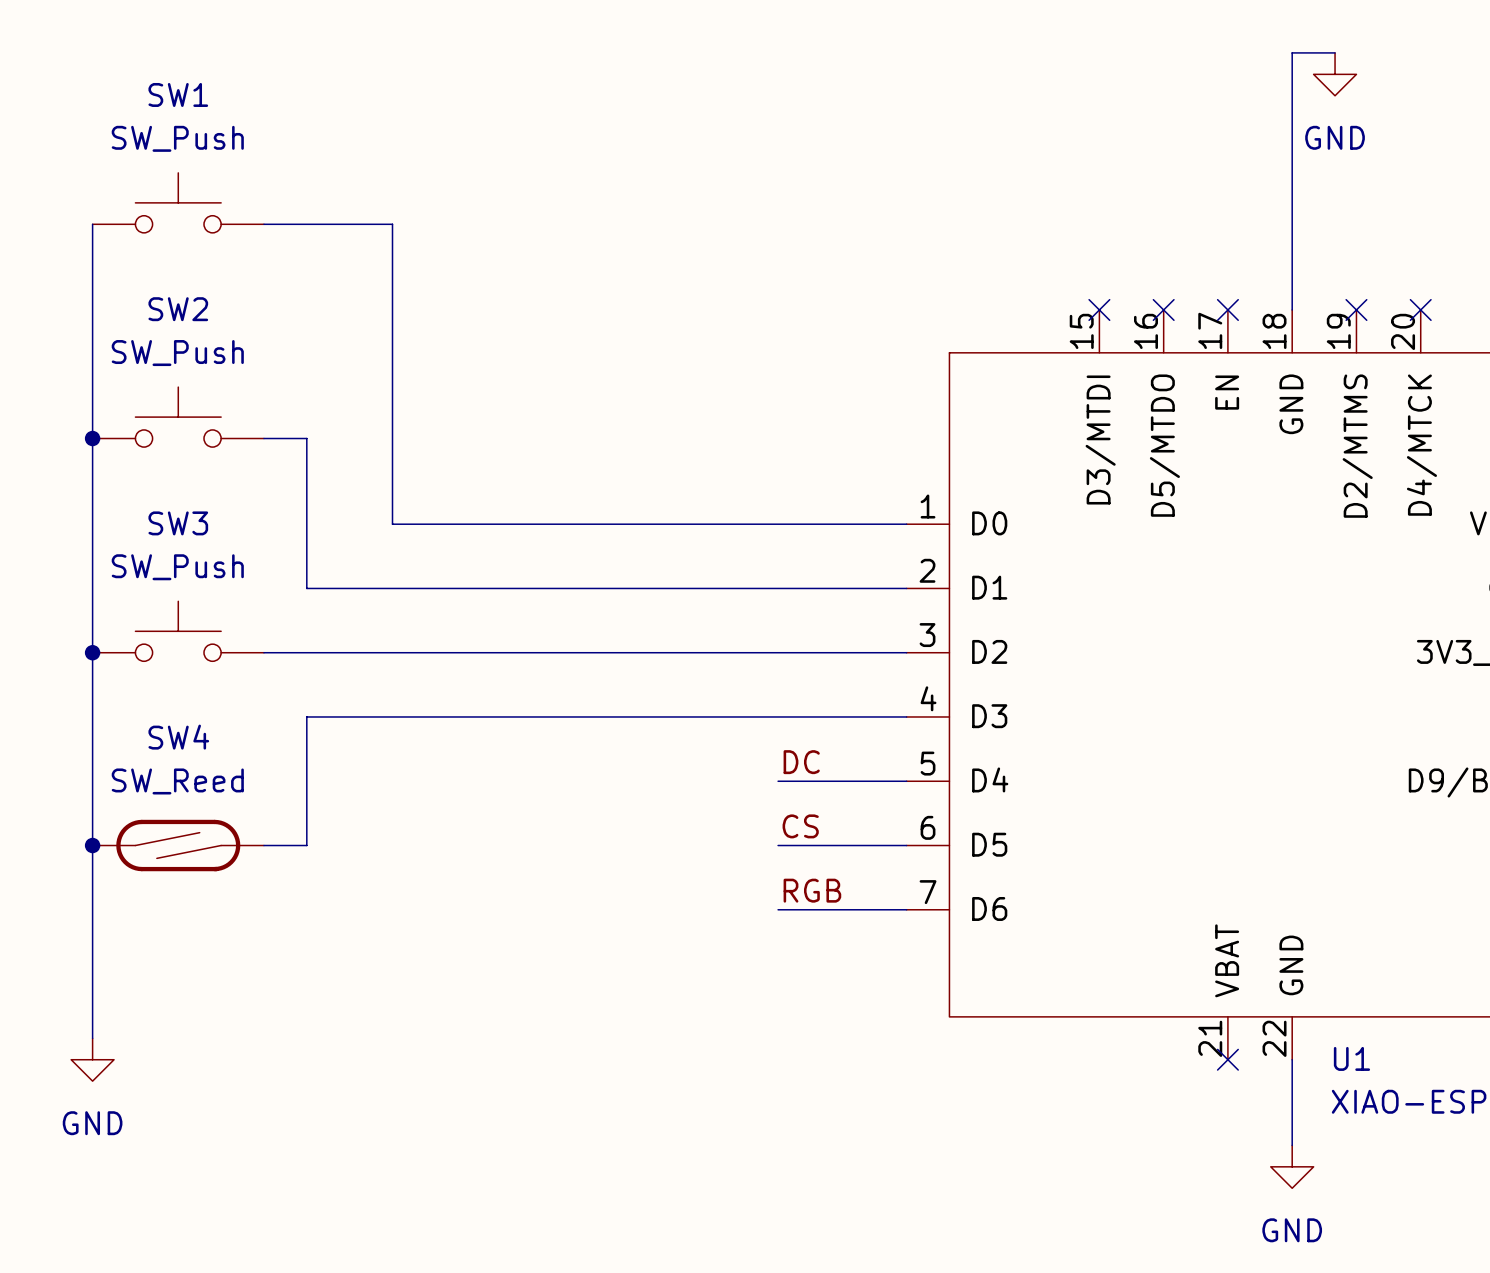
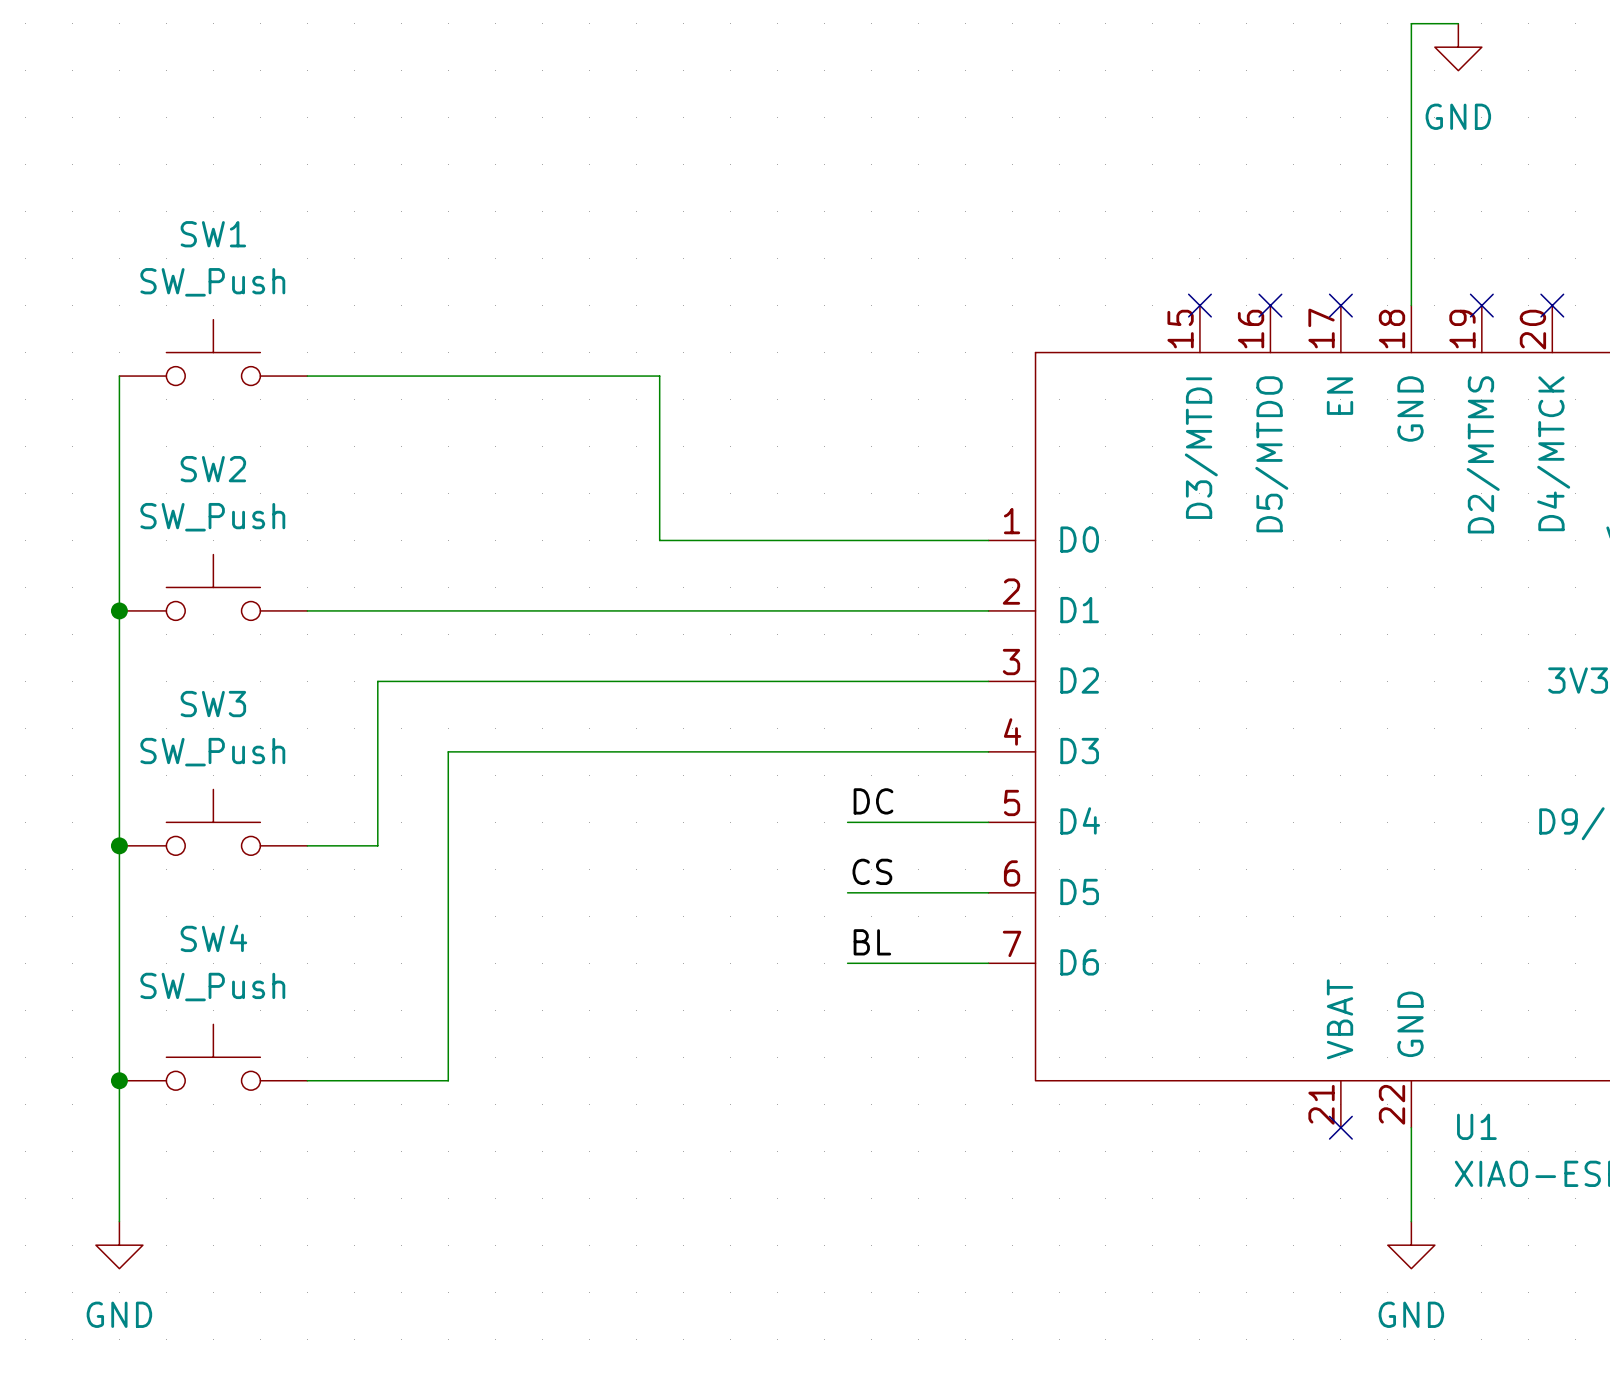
SW1 position: (178, 202) -> (213, 352)
wire: (92, 224) (92, 1038) -> none
wire: (263, 224) (392, 224) (392, 524) (606, 524) -> (307, 376) (659, 376) (659, 540)
wire: none -> (119, 376) (119, 1221)
SW2 position: (178, 417) -> (213, 587)
junction: (92, 438) -> none
wire: (263, 438) (306, 438) (306, 588) -> (307, 610) (330, 610)
SW3 position: (178, 631) -> (213, 822)
junction position: (92, 652) -> (119, 610)
wire: (263, 652) (349, 652) -> (307, 845) (377, 845) (377, 681)
wire: (413, 716) (306, 716) (306, 845) (263, 845) -> (448, 751) (448, 1080) (307, 1080)
SW4 value: SW_Reed (177, 781) -> SW_Push (212, 987)
SW4 symbol: [92, 819, 264, 872] -> [119, 1024, 308, 1091]
junction position: (92, 845) -> (119, 845)
label: RGB (812, 890) -> BL (872, 942)
junction: none -> (119, 1080)
power symbol position: GND (92, 1059) -> GND (119, 1245)

